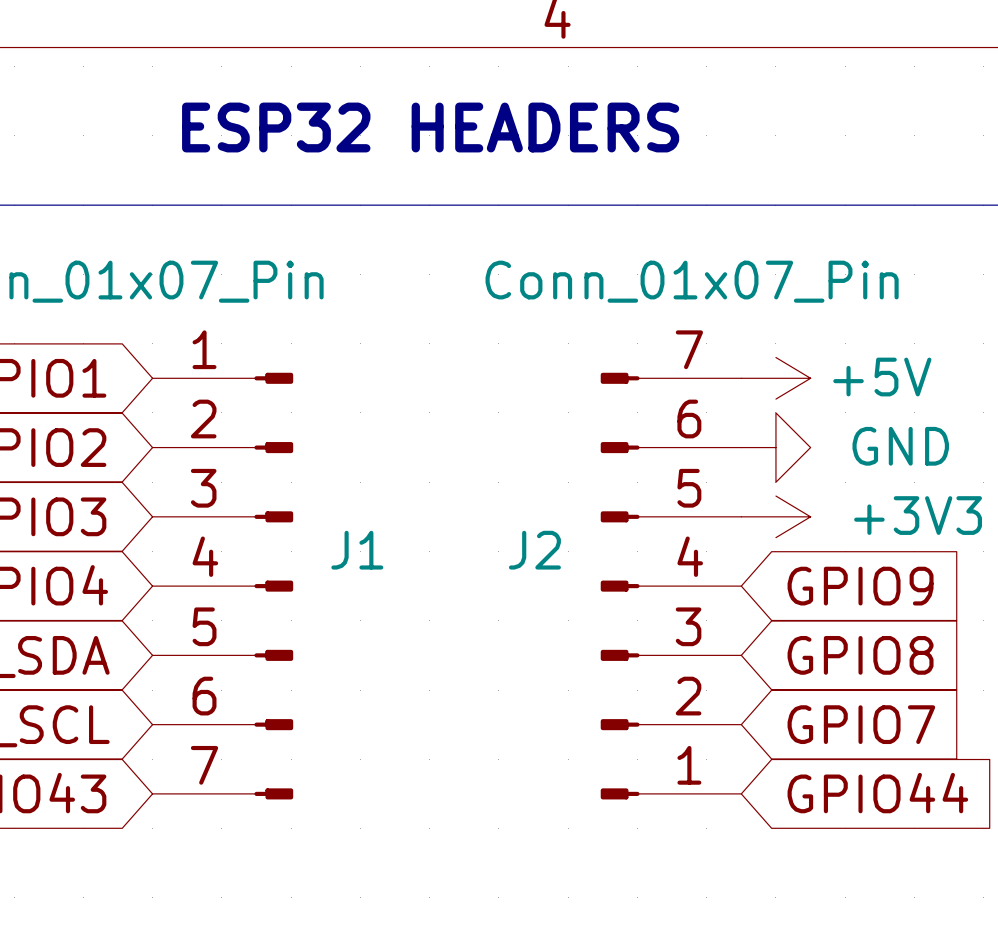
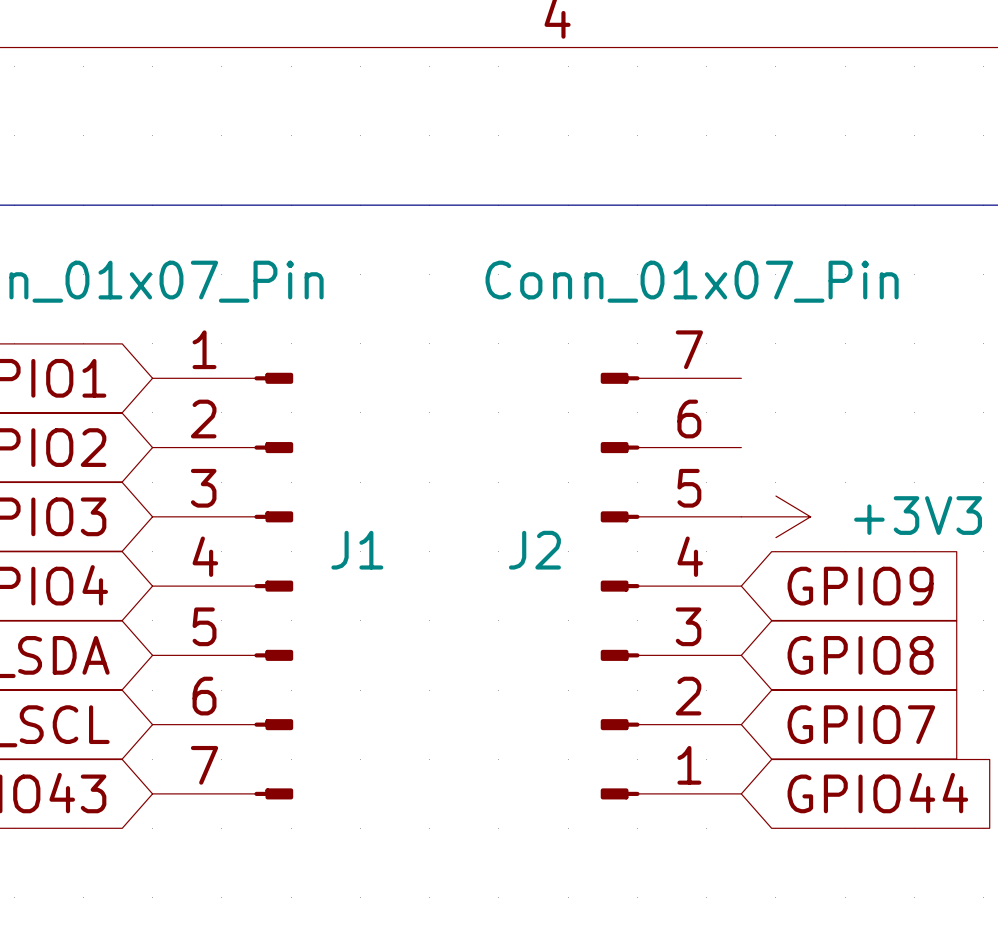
text: ESP32 HEADERS (430, 127) -> none
power symbol: +5V (775, 378) -> none
power symbol: GND (775, 447) -> none

